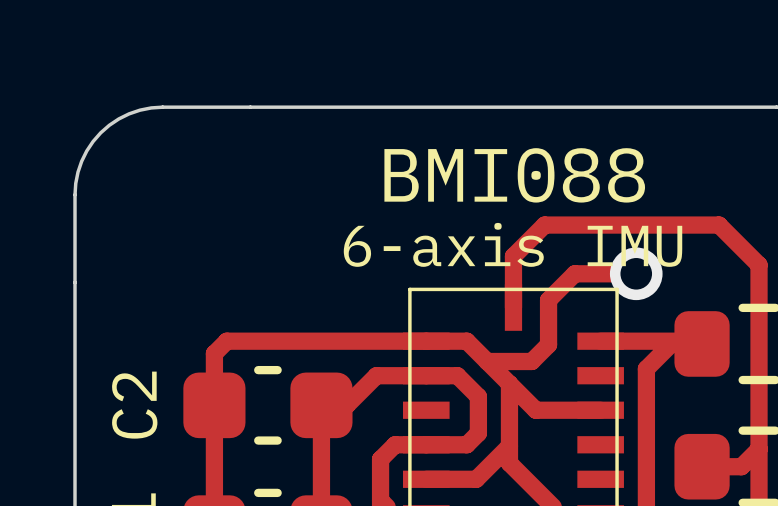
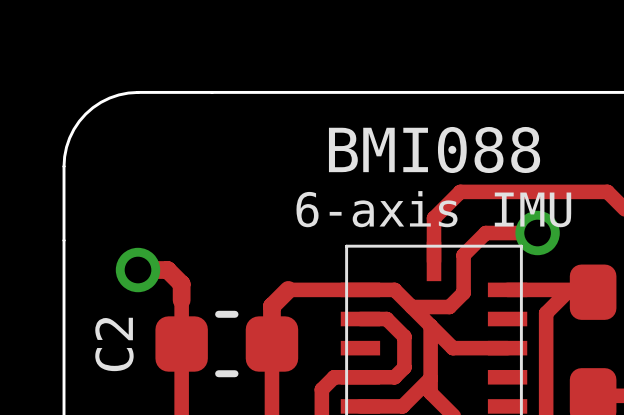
via: none -> (138, 270)
track: (340, 341) (226, 341) (214, 353) -> (138, 270) (167, 270) (181, 284) (181, 300)
track: (426, 375) (376, 375) (346, 405) (321, 405) -> (288, 289) (271, 306) (271, 344)

